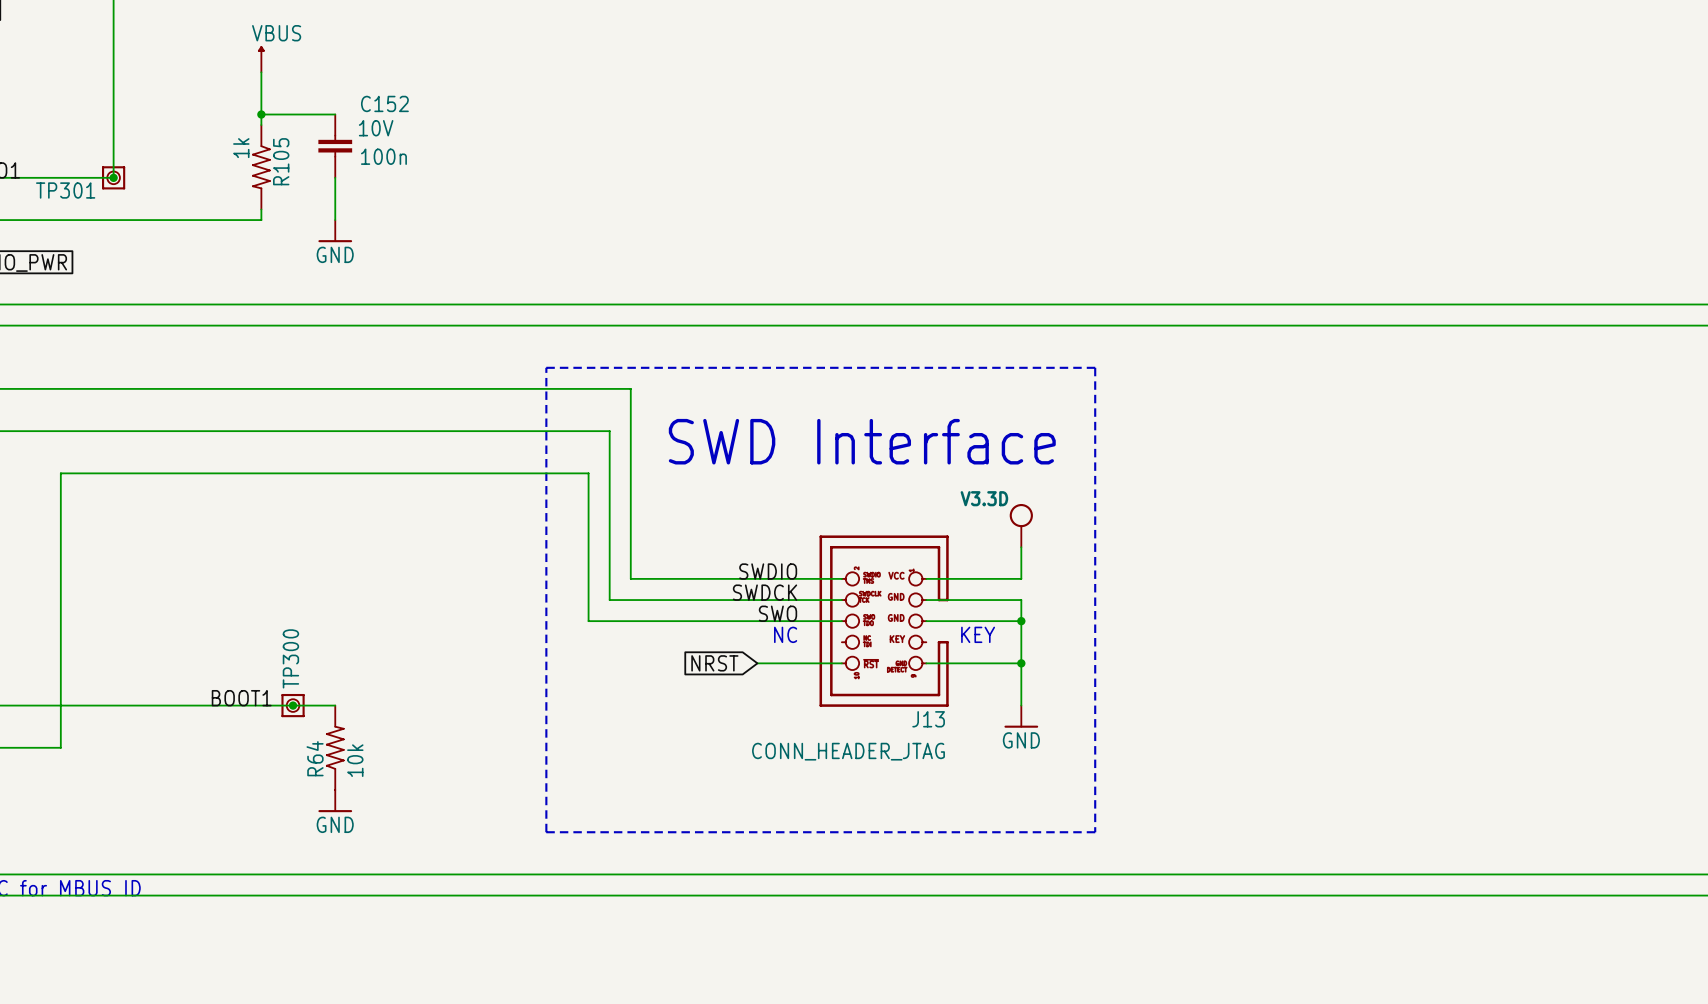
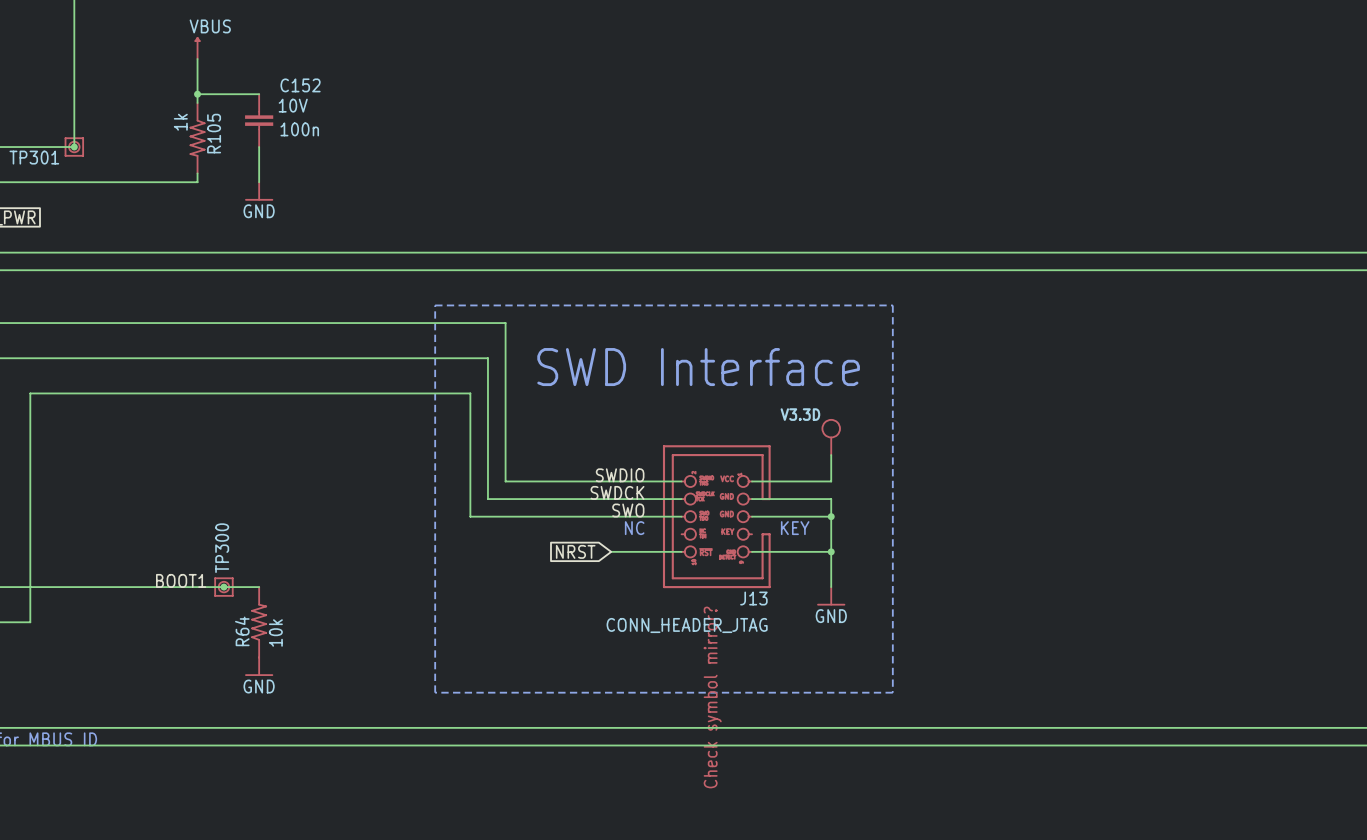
J13 text: none -> Check symbol mirror? (712, 697)

